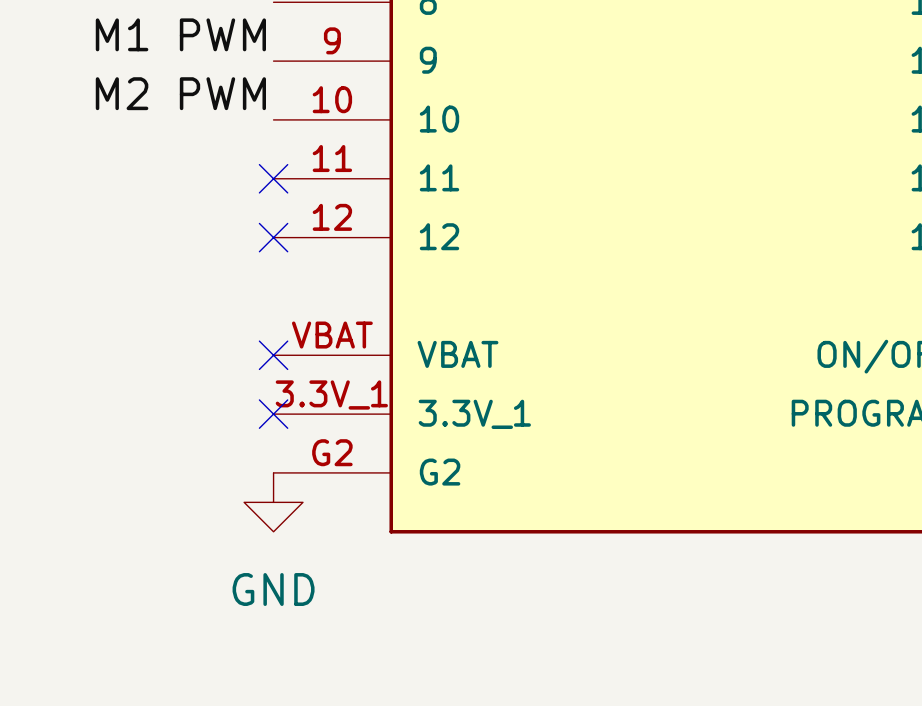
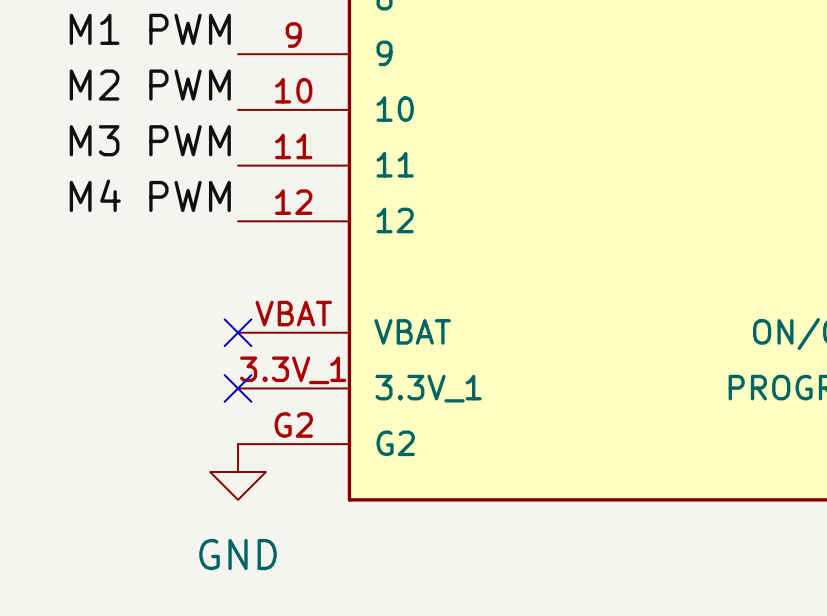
label: none -> M3 PWM (150, 140)
no-connect mark: (273, 178) -> none
label: none -> M4 PWM (150, 195)
no-connect mark: (273, 237) -> none

